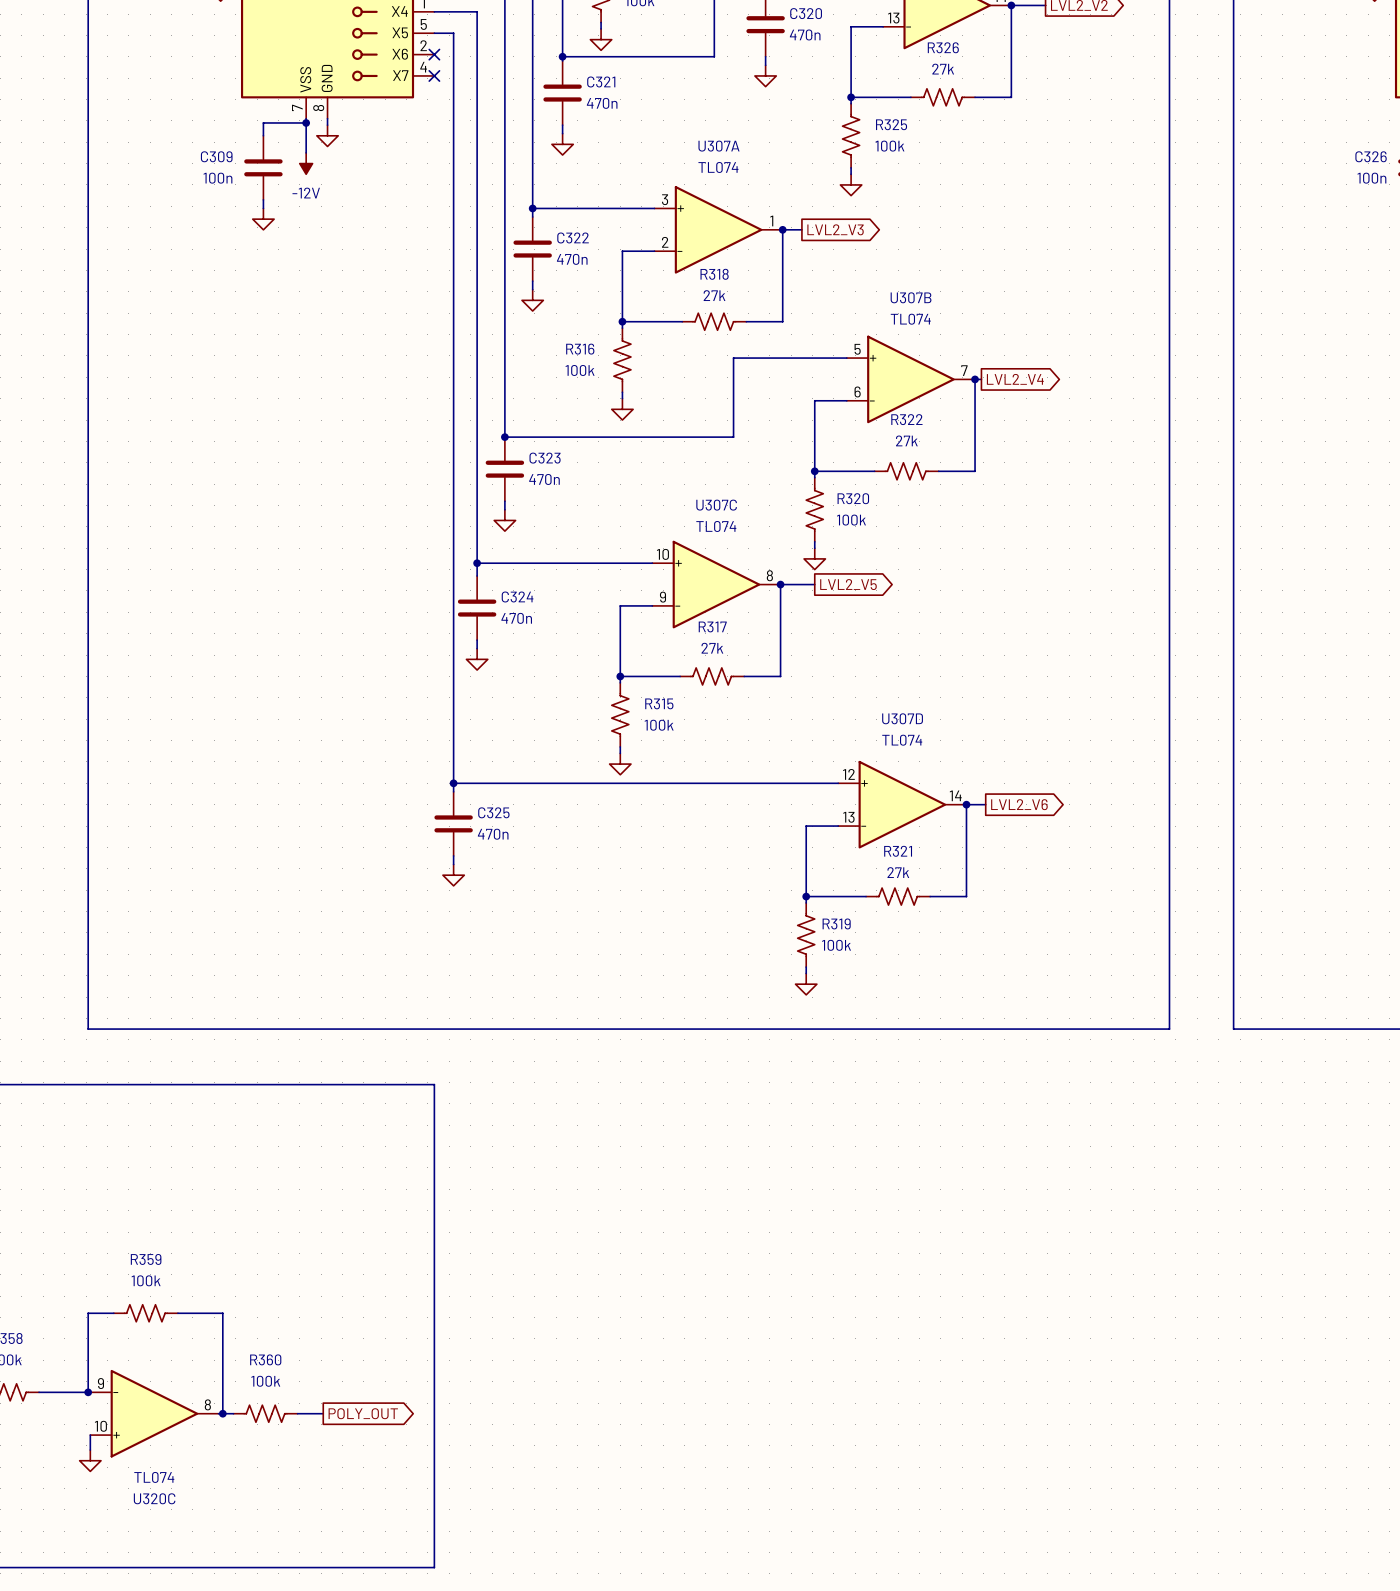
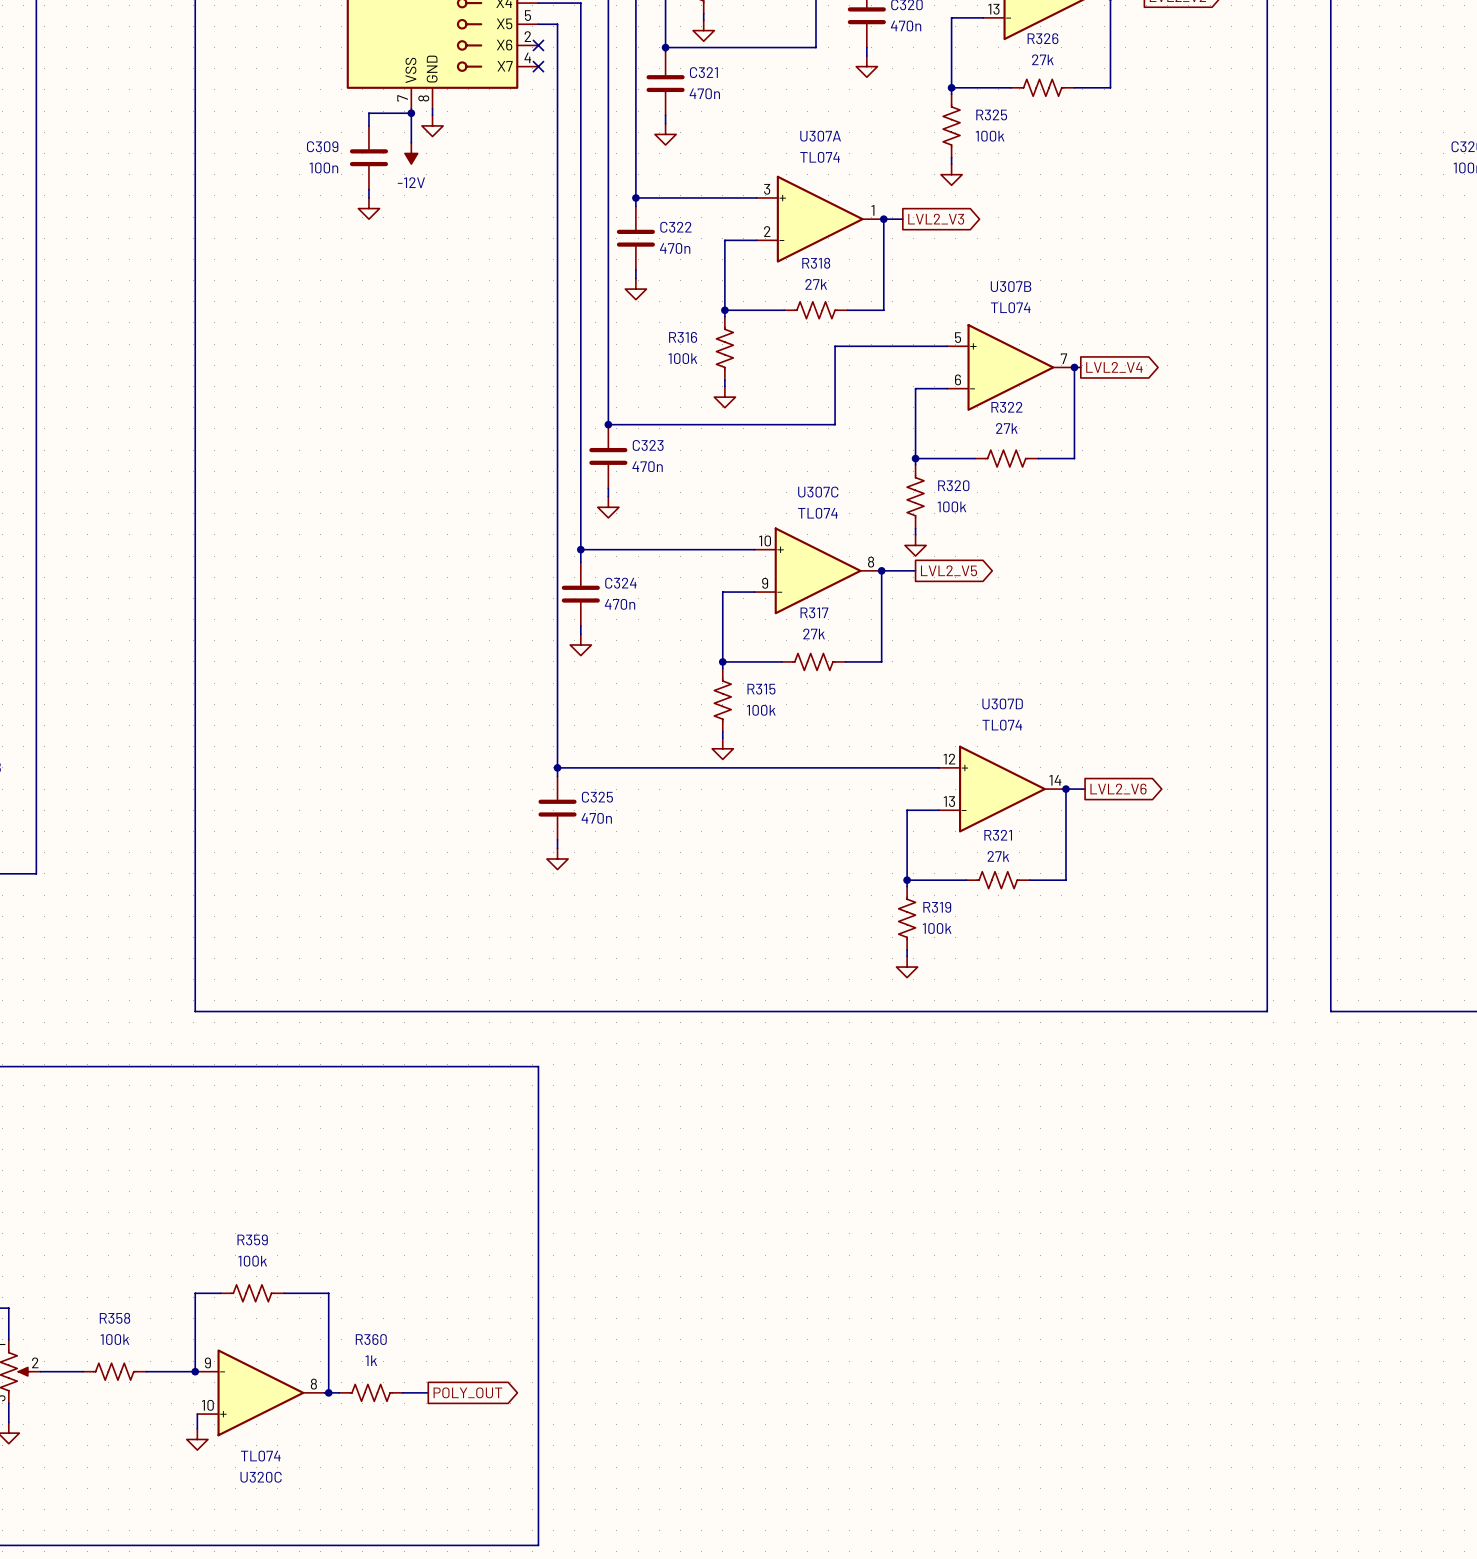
R360 value: 100k (265, 1381) -> 1k (371, 1360)

